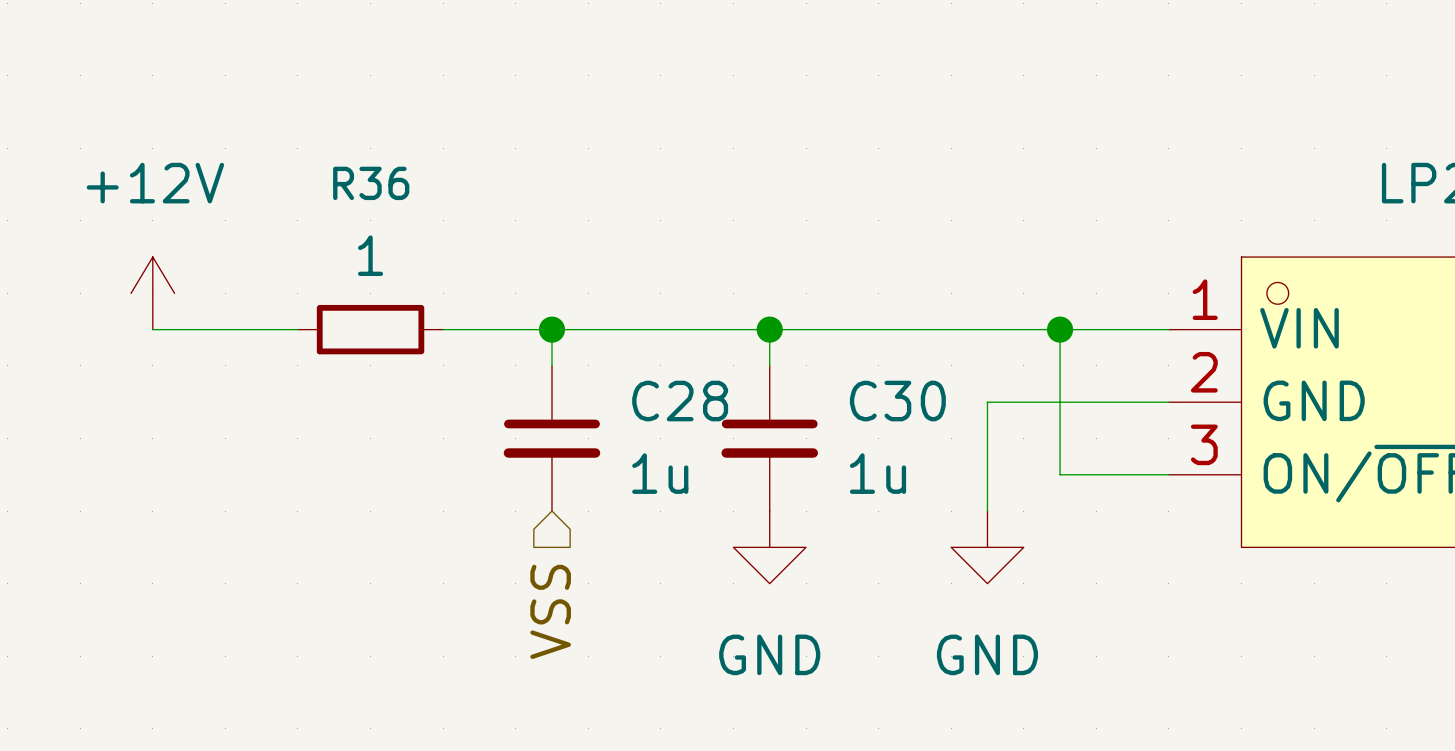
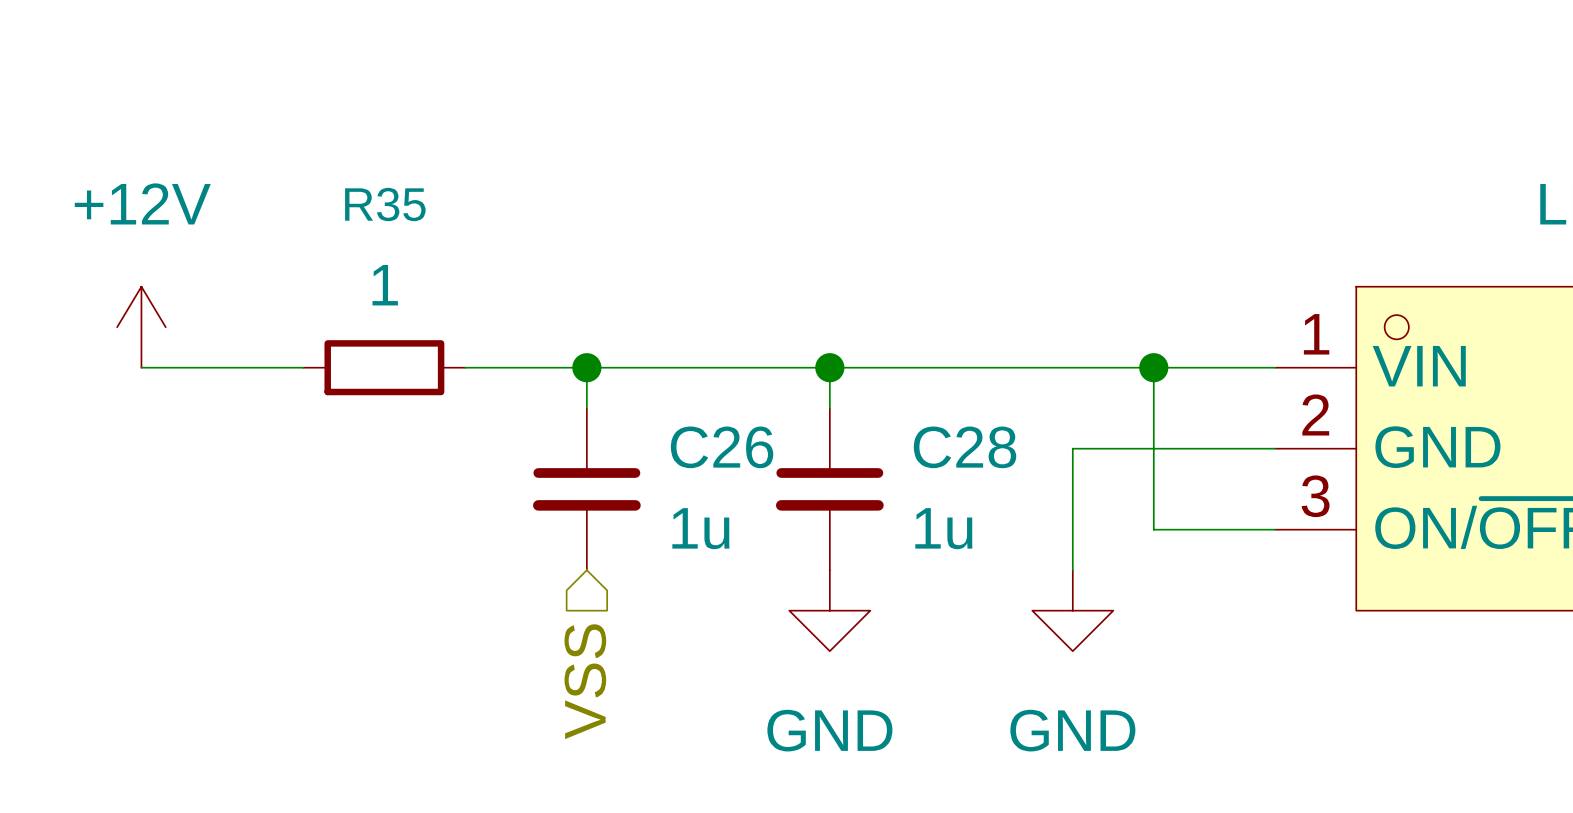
R36 name: R36 (371, 183) -> R35 (385, 204)
C28 name: C28 (680, 401) -> C26 (722, 447)
C30 name: C30 (897, 401) -> C28 (965, 447)

